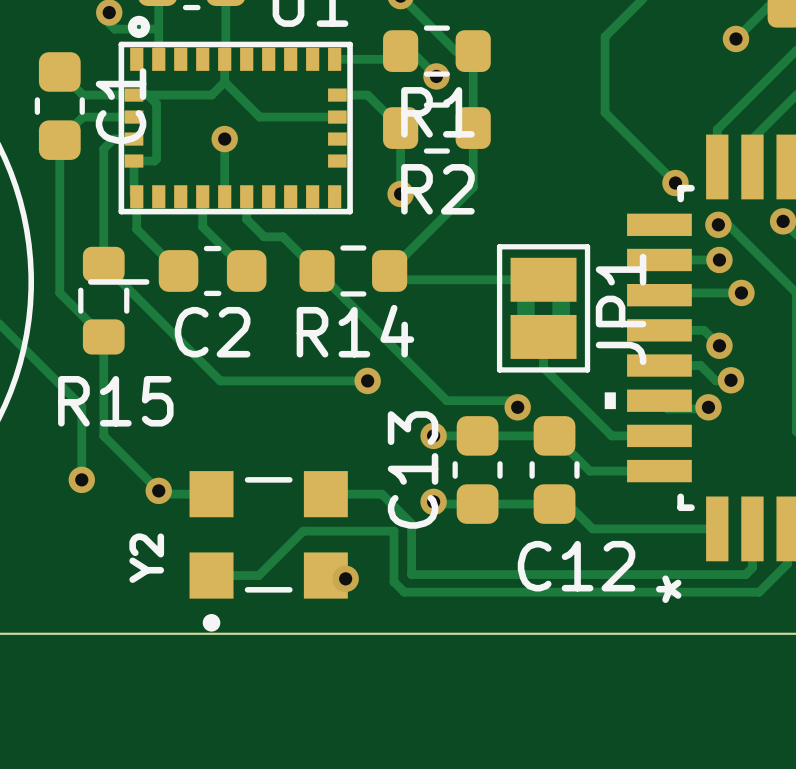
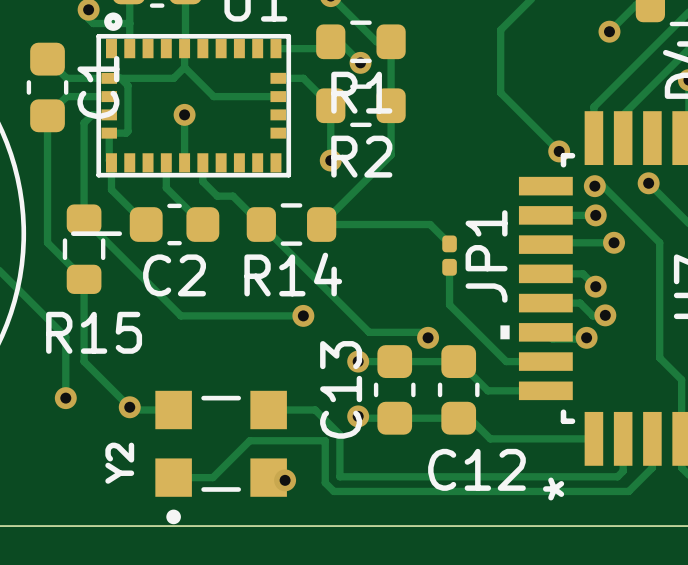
JP1 footprint: [496, 244, 591, 373] -> [442, 235, 457, 276]
track: none -> (321, 224) (430, 224) (449, 243)
track: (398, 279) (543, 279) -> none

